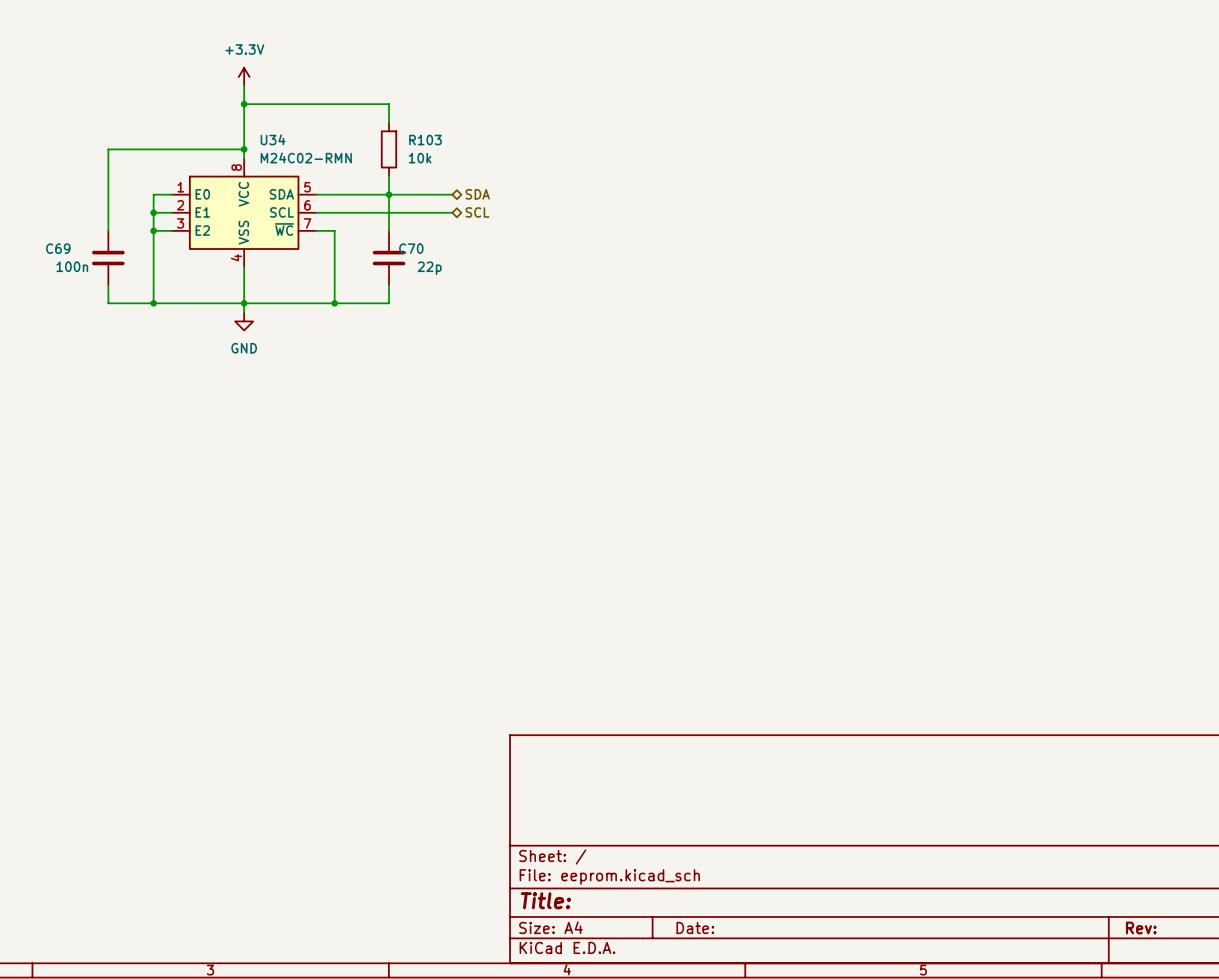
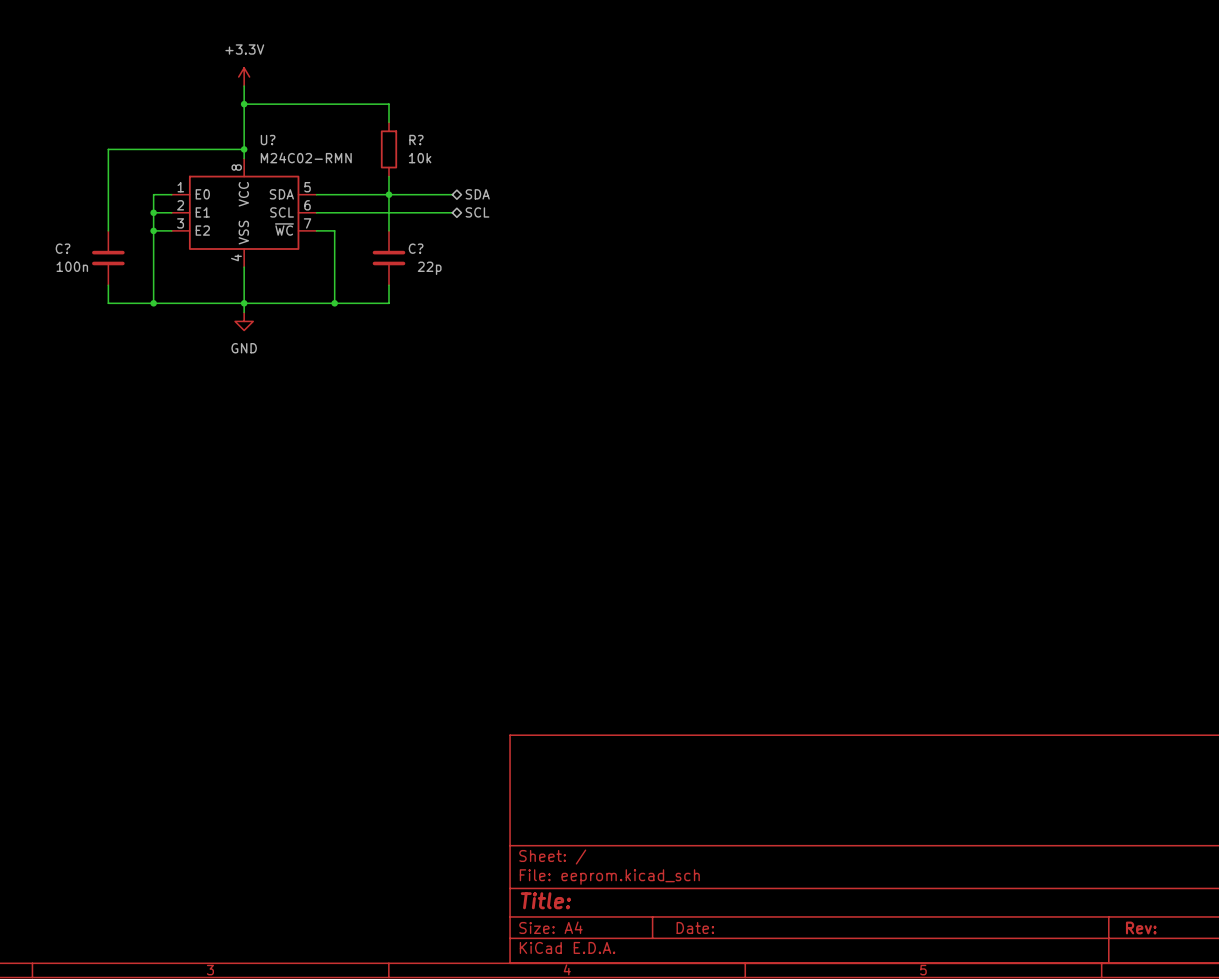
U34 name: U34 (273, 139) -> U? (268, 140)
R103 name: R103 (425, 140) -> R? (416, 140)
C69 name: C69 (58, 248) -> C? (63, 248)
C70 name: C70 (411, 248) -> C? (416, 248)

